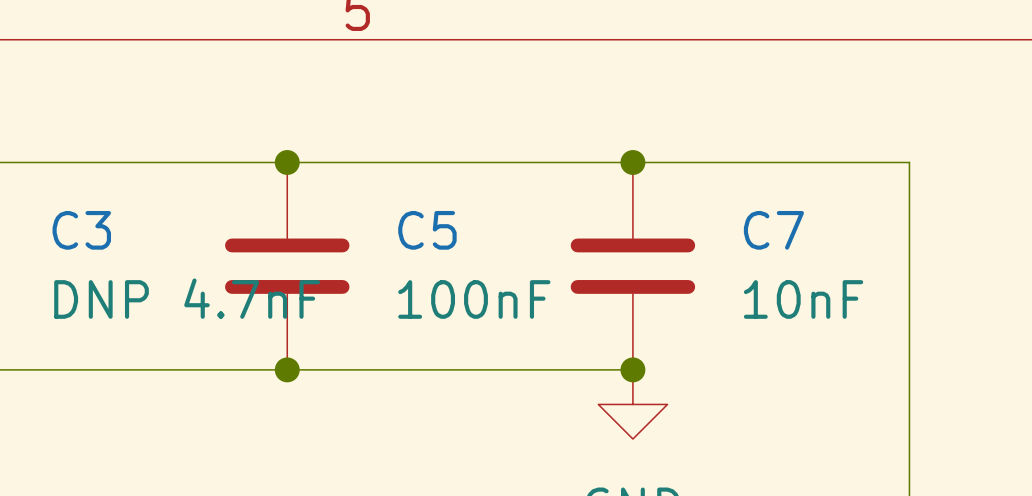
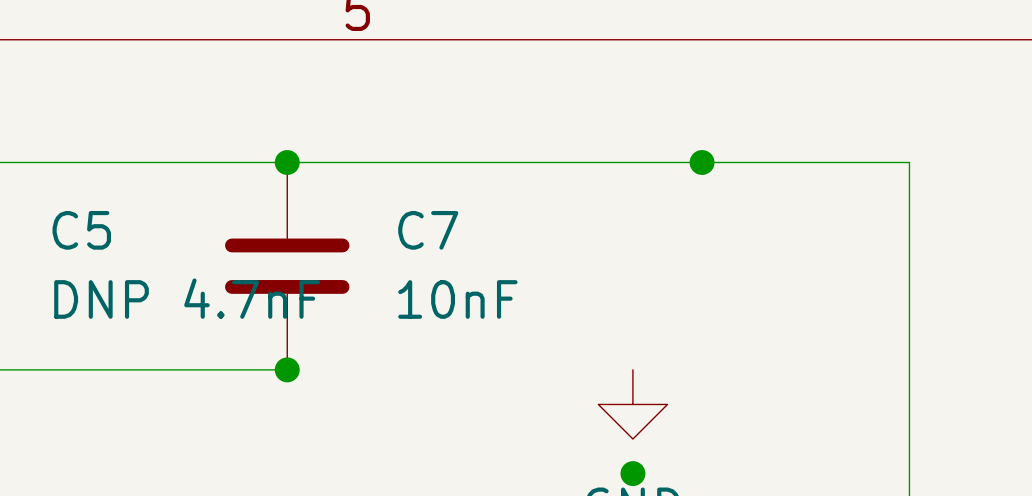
junction position: (632, 162) -> (702, 162)
C3 name: C3 (81, 230) -> C5 (81, 230)
C5 name: C5 (427, 230) -> C7 (428, 230)
C7: 10nF (632, 266) -> none
C5 value: 100nF (474, 299) -> 10nF (457, 299)
wire: (287, 369) (632, 369) -> none
junction: (632, 369) -> none
junction: none -> (632, 473)

